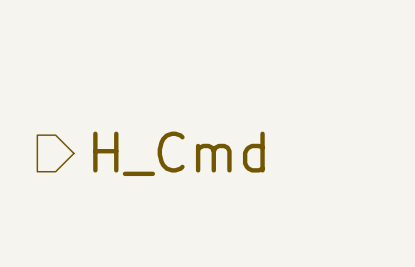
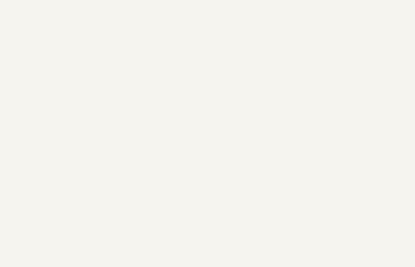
hierarchical label: H_Cmd (178, 153) -> none

